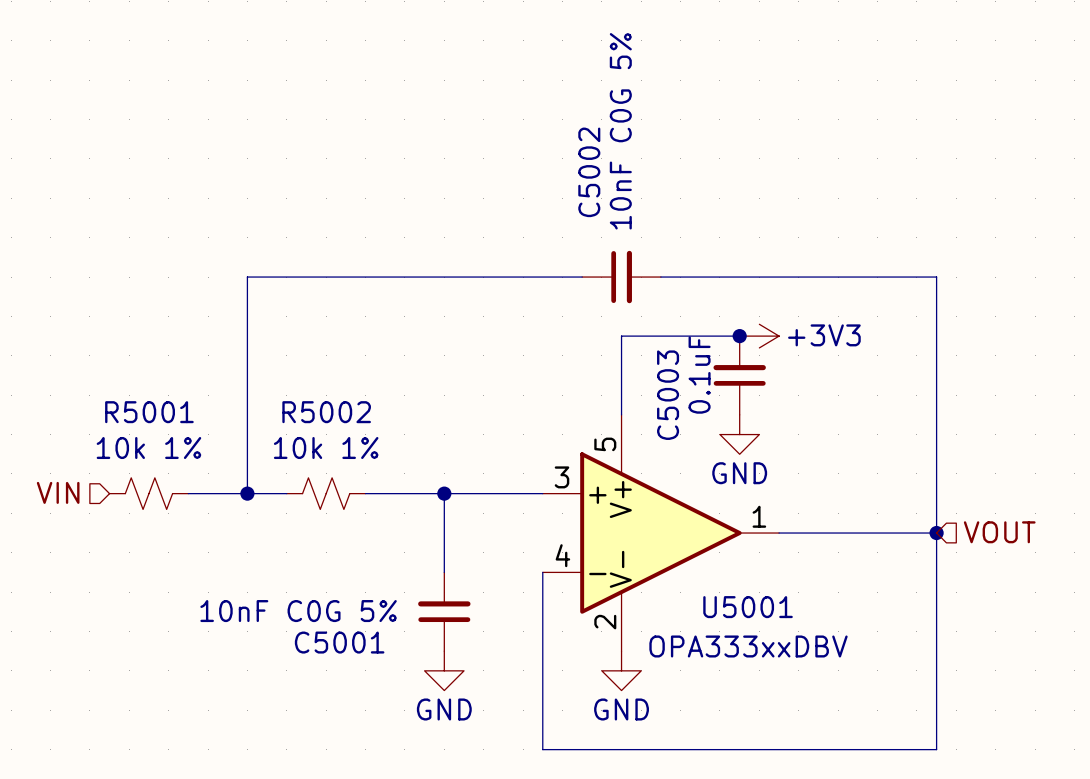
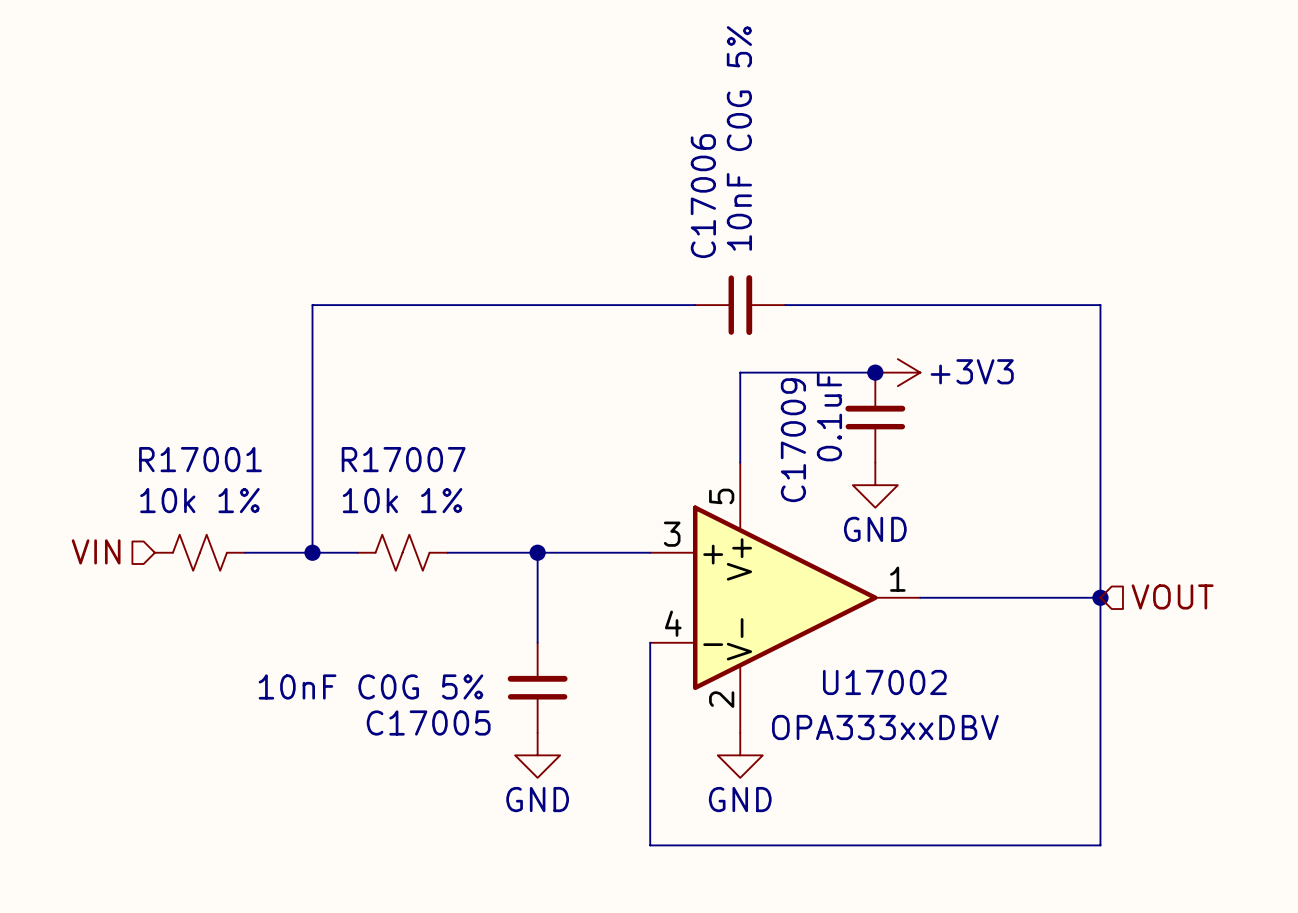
C5002 name: C5002 (589, 172) -> C17006 (703, 196)
C5003 name: C5003 (668, 395) -> C17009 (793, 440)
R5001 name: R5001 (149, 412) -> R17001 (200, 459)
R5002 name: R5002 (326, 412) -> R17007 (403, 459)
U5001 name: U5001 (748, 607) -> U17002 (884, 682)
C5001 name: C5001 (339, 642) -> C17005 (428, 722)

